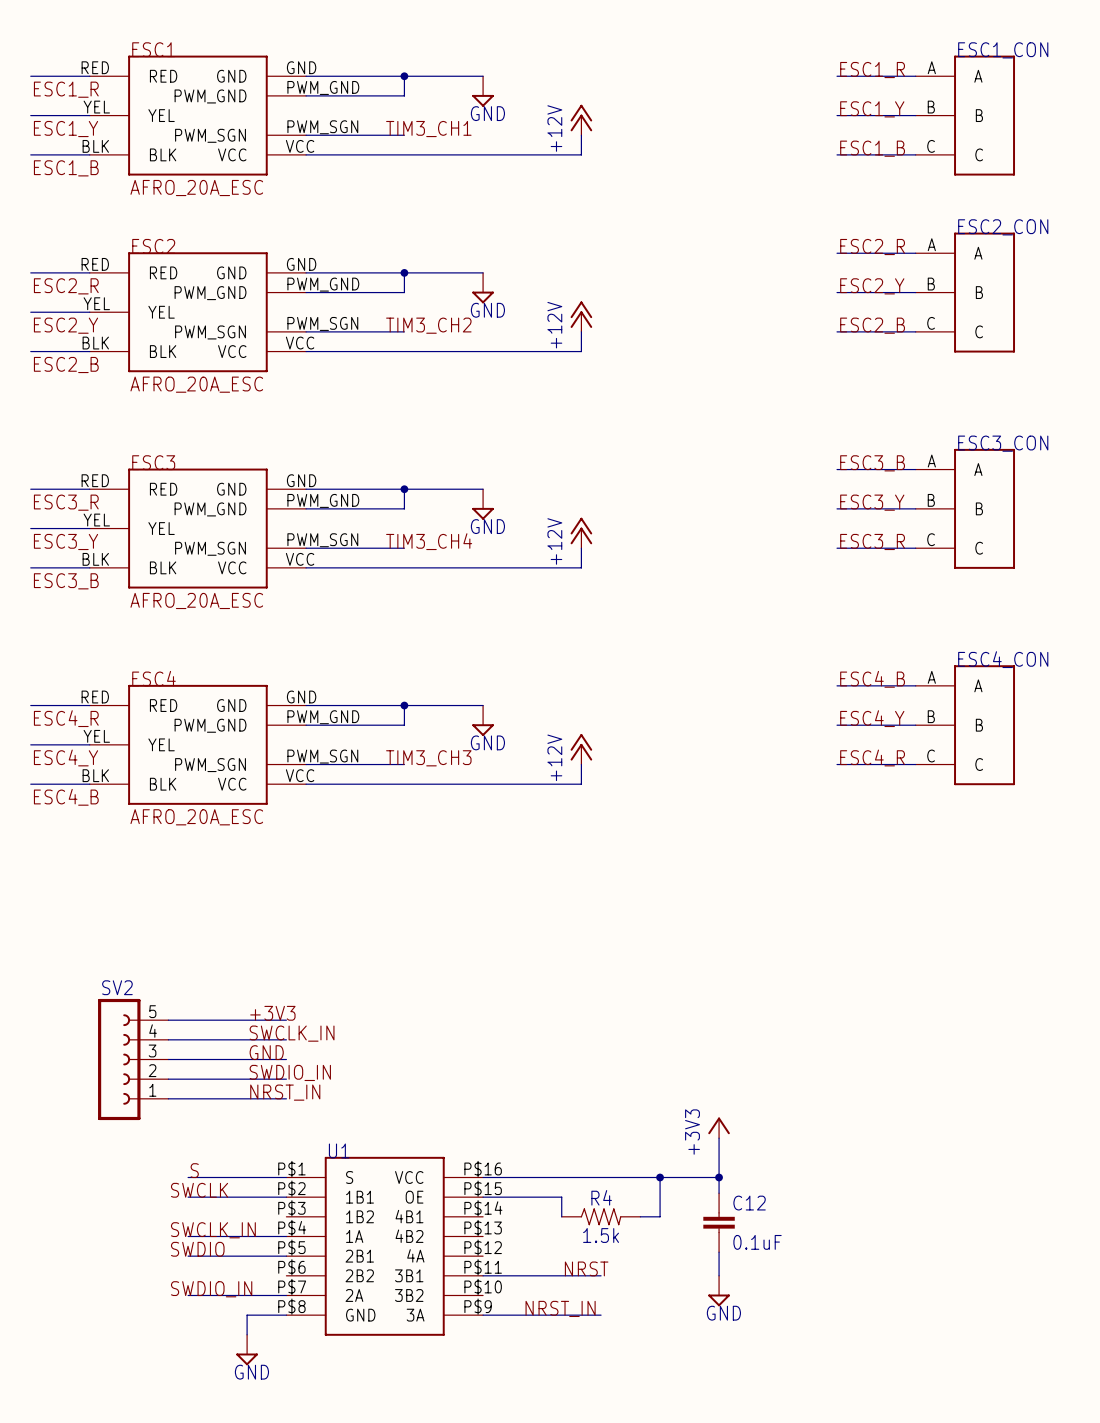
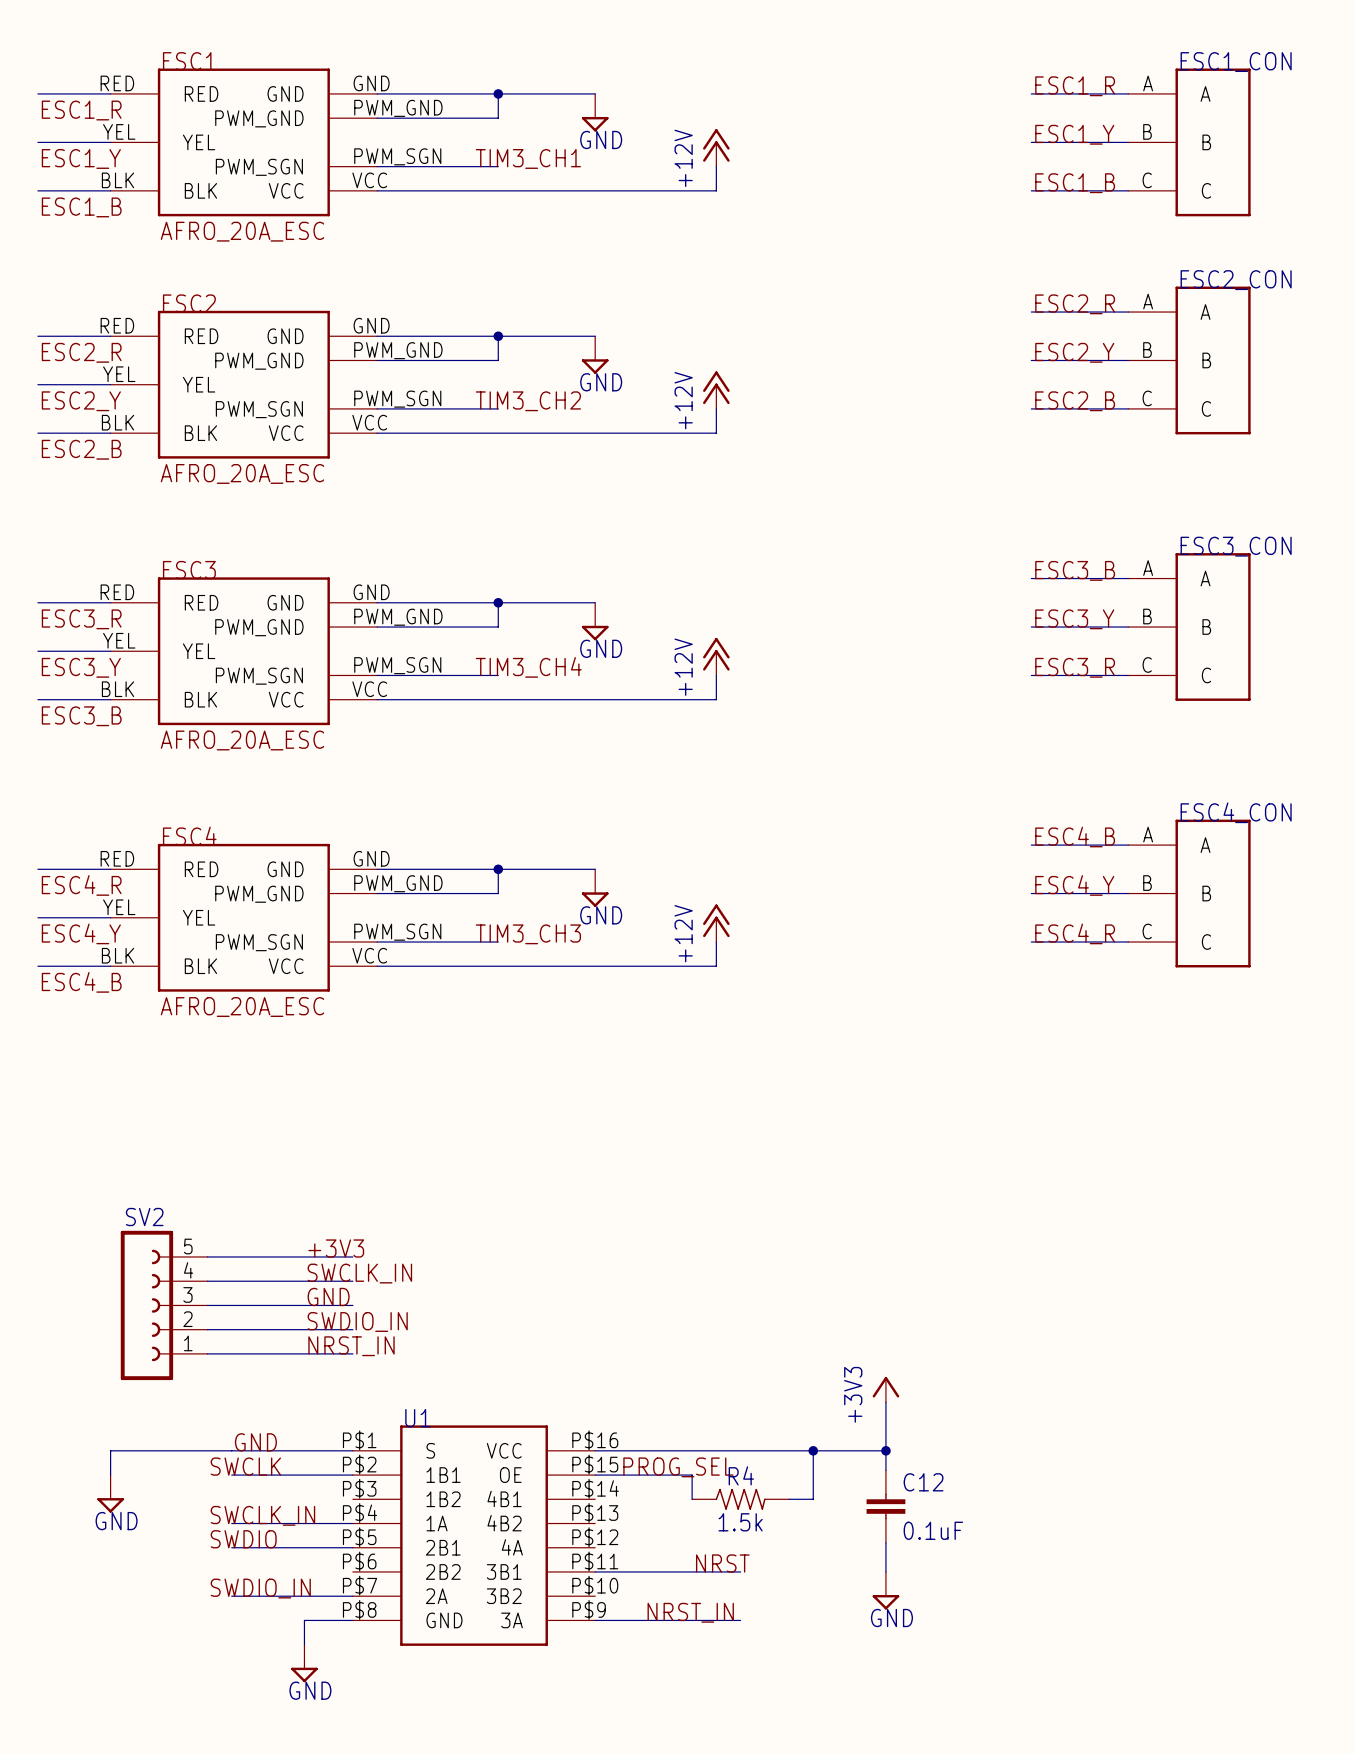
label: S (194, 1170) -> GND (255, 1442)
wire: none -> (231, 1450) (110, 1450) (110, 1475)
label: none -> PROG_SEL (678, 1467)
power symbol: none -> GND (110, 1493)

